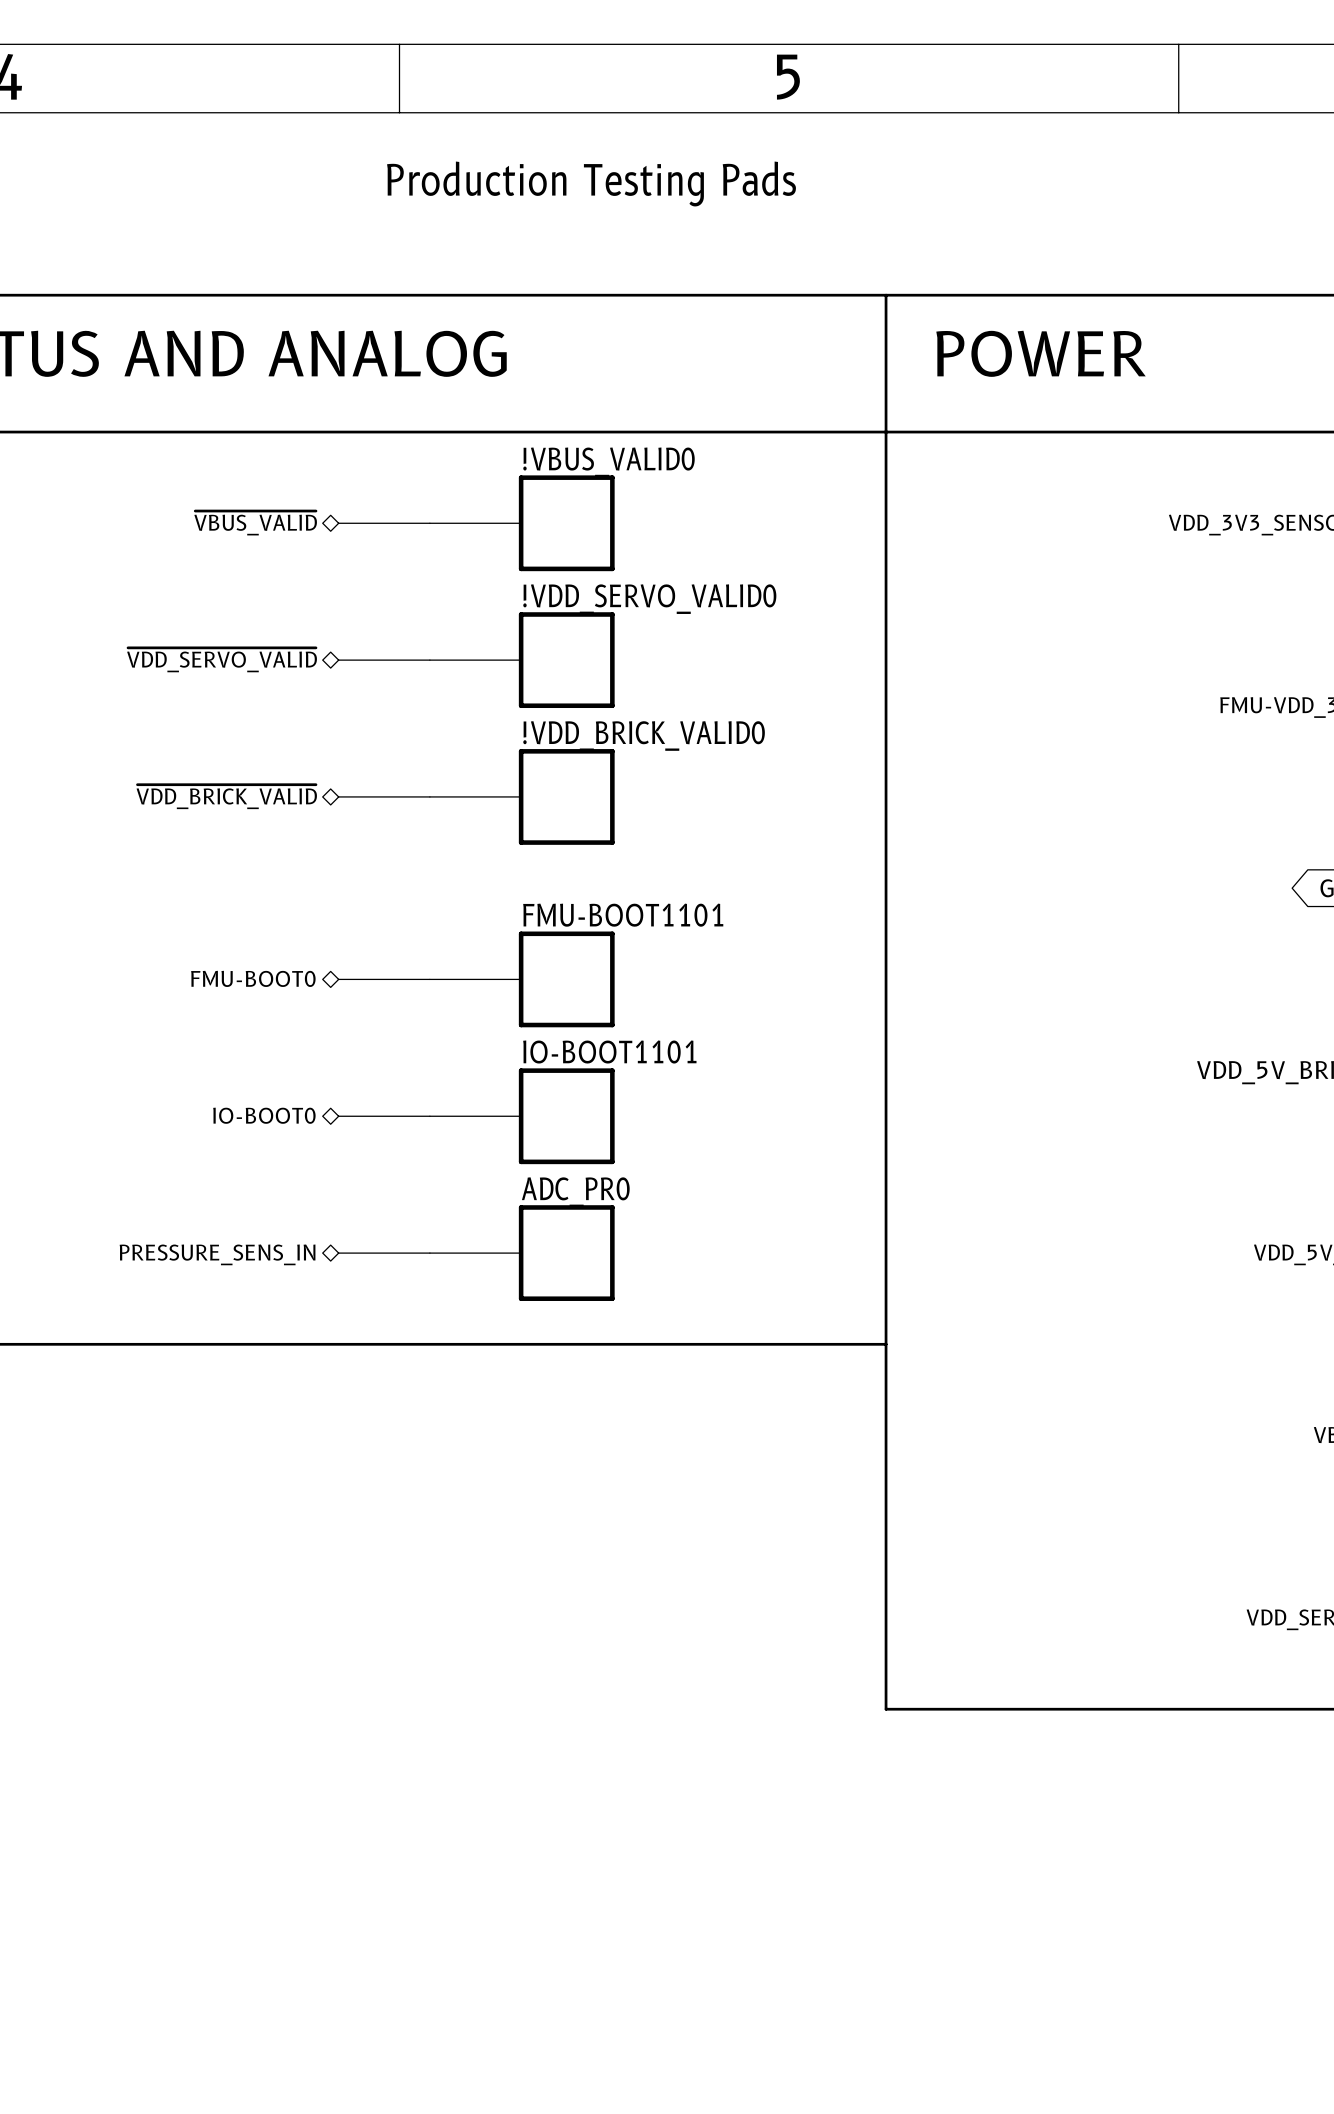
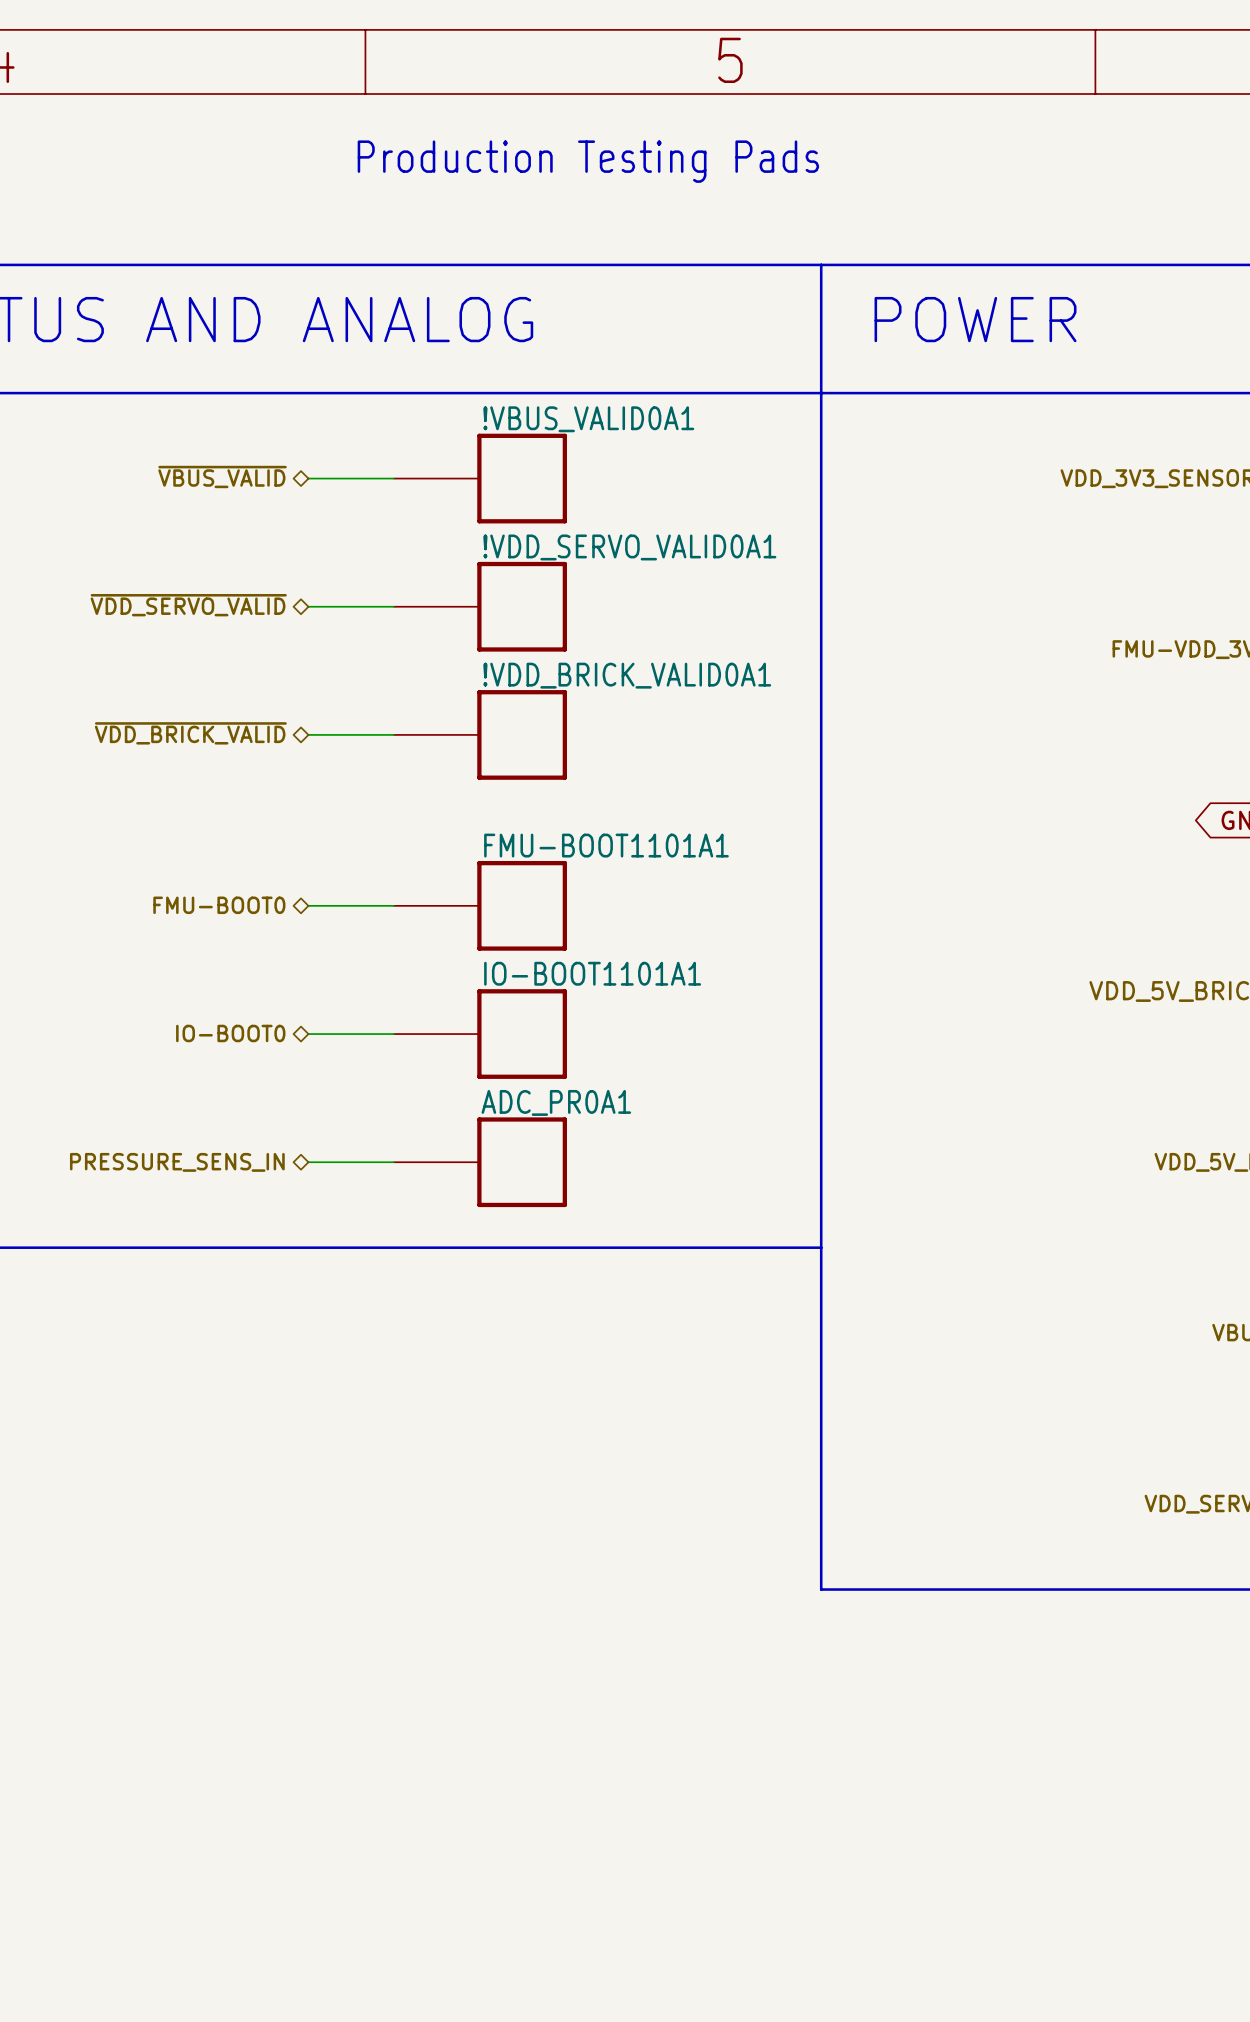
!VBUS_VALID0 name: !VBUS_VALID0 (609, 462) -> !VBUS_VALID0A1 (588, 419)
!VDD_SERVO_VALID0 name: !VDD_SERVO_VALID0 (649, 599) -> !VDD_SERVO_VALID0A1 (629, 547)
!VDD_BRICK_VALID0 name: !VDD_BRICK_VALID0 (644, 736) -> !VDD_BRICK_VALID0A1 (627, 675)
FMU-BOOT1101 name: FMU-BOOT1101 (623, 915) -> FMU-BOOT1101A1 (606, 845)
IO-BOOT1101 name: IO-BOOT1101 (609, 1052) -> IO-BOOT1101A1 (592, 973)
ADC_PR0 name: ADC_PR0 (575, 1192) -> ADC_PR0A1 (556, 1102)

